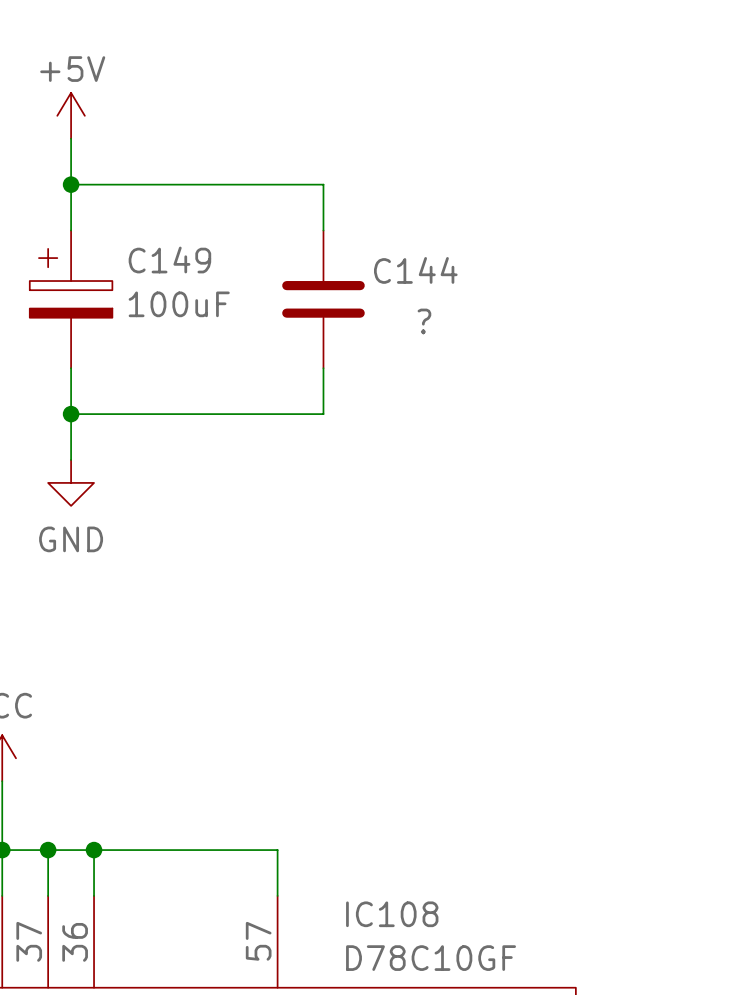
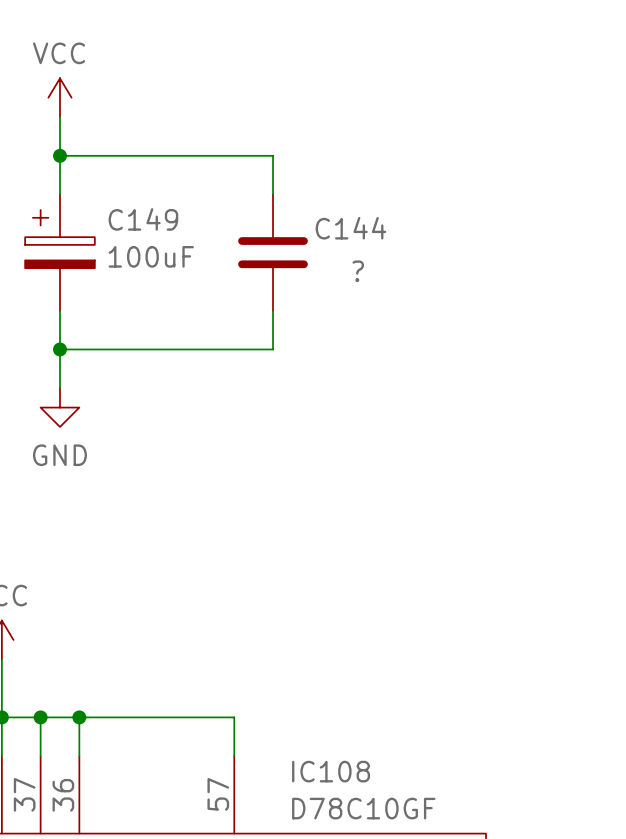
power symbol: +5V (71, 115) -> VCC (59, 97)

